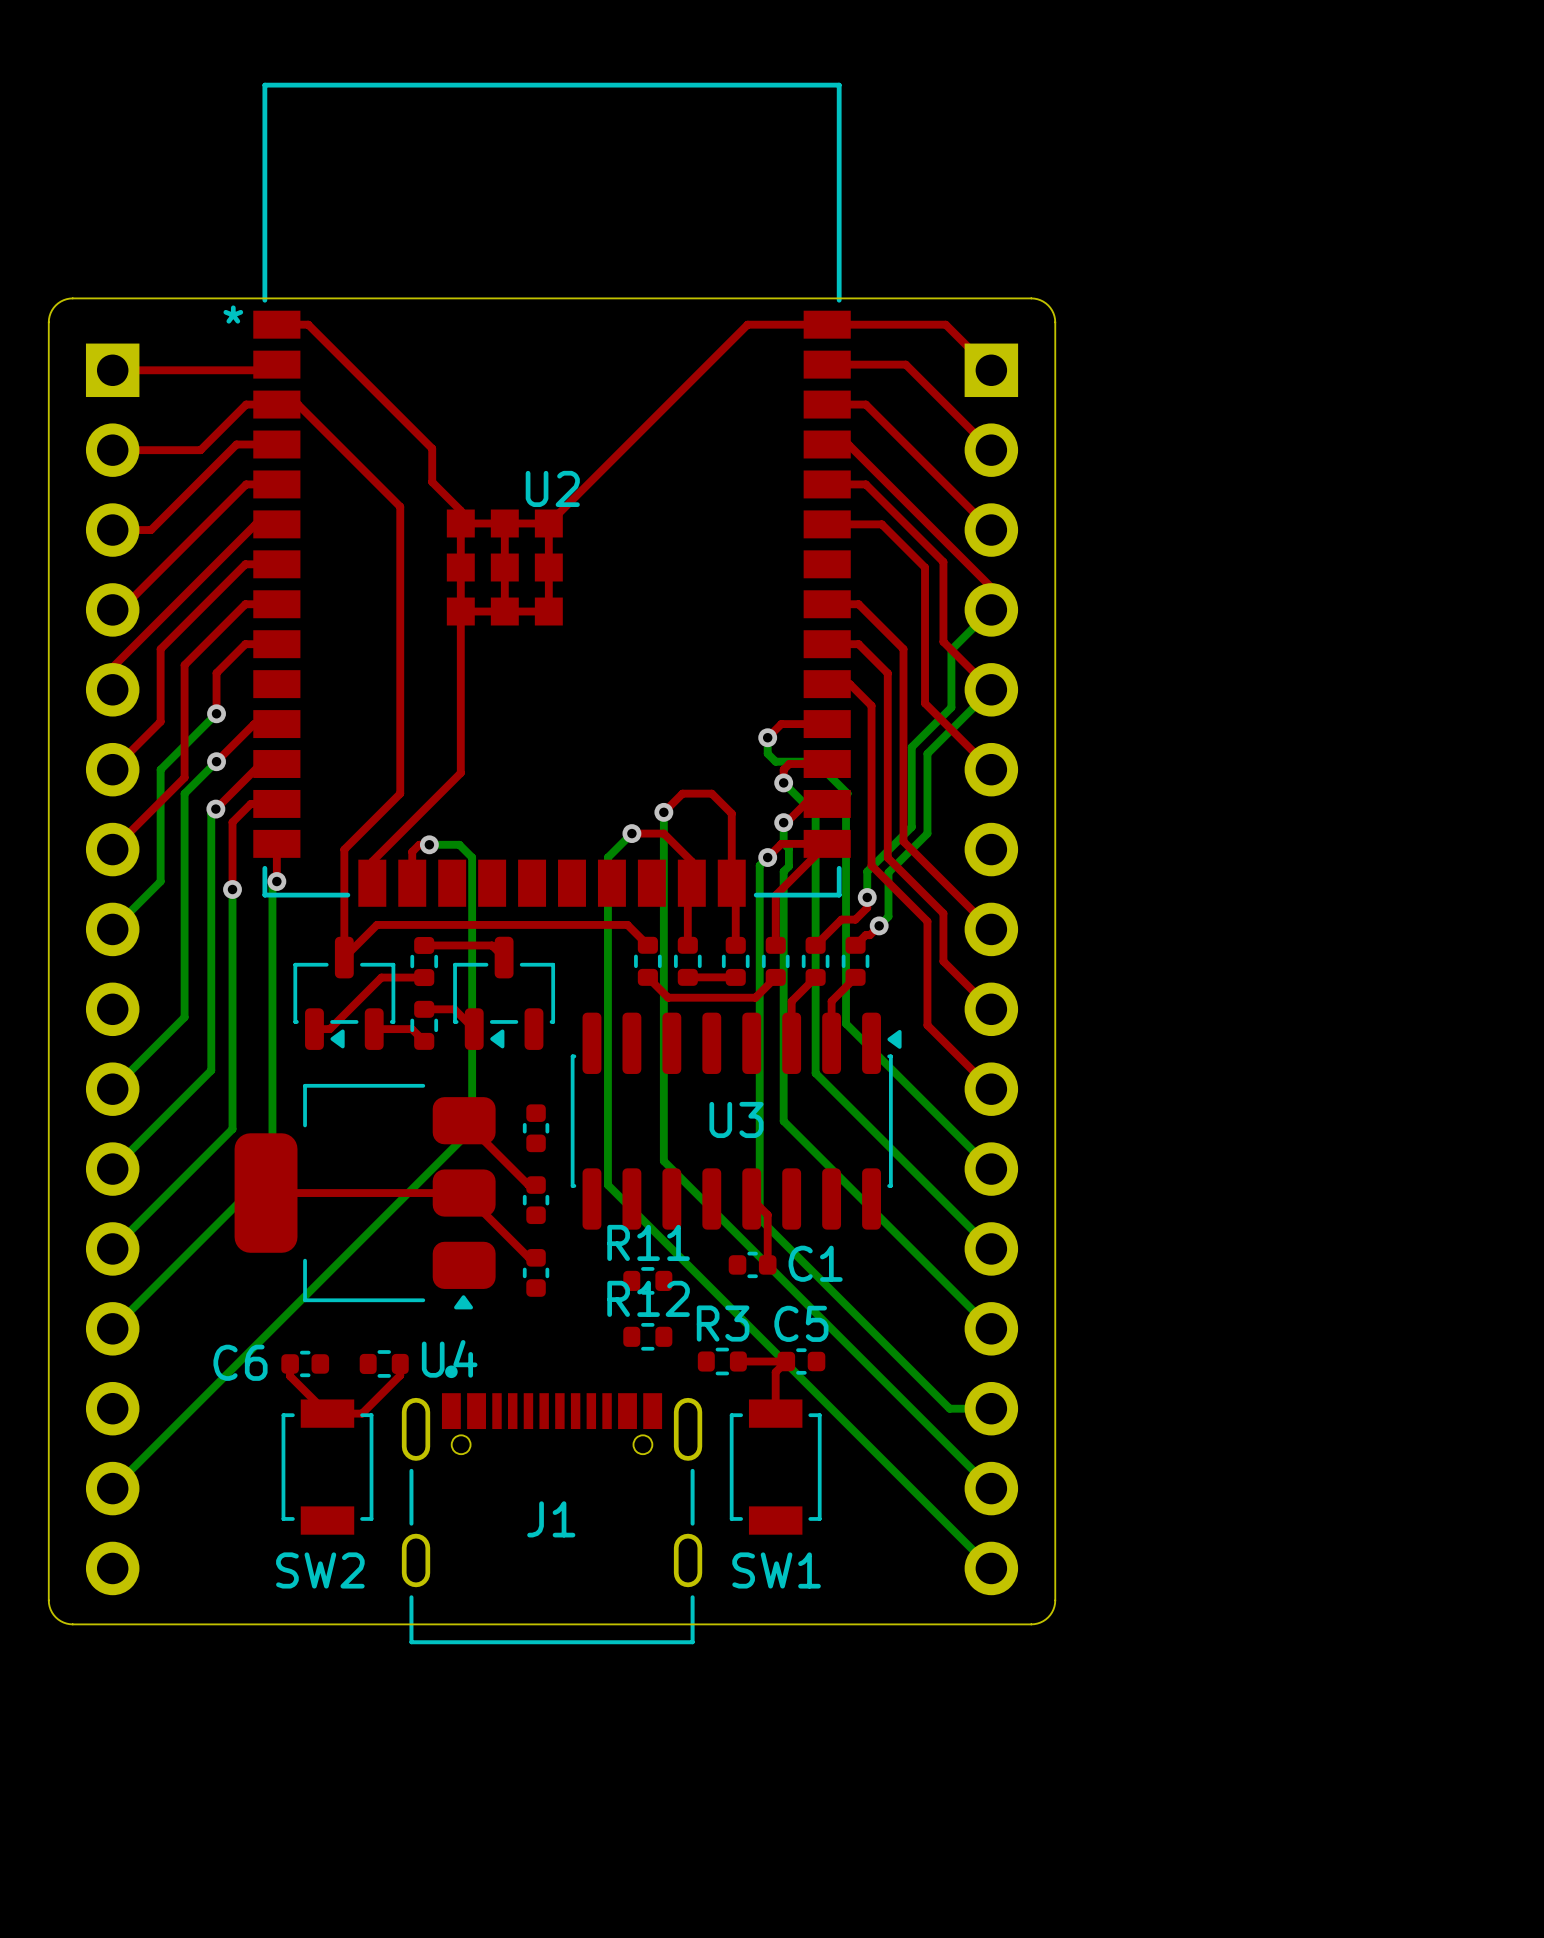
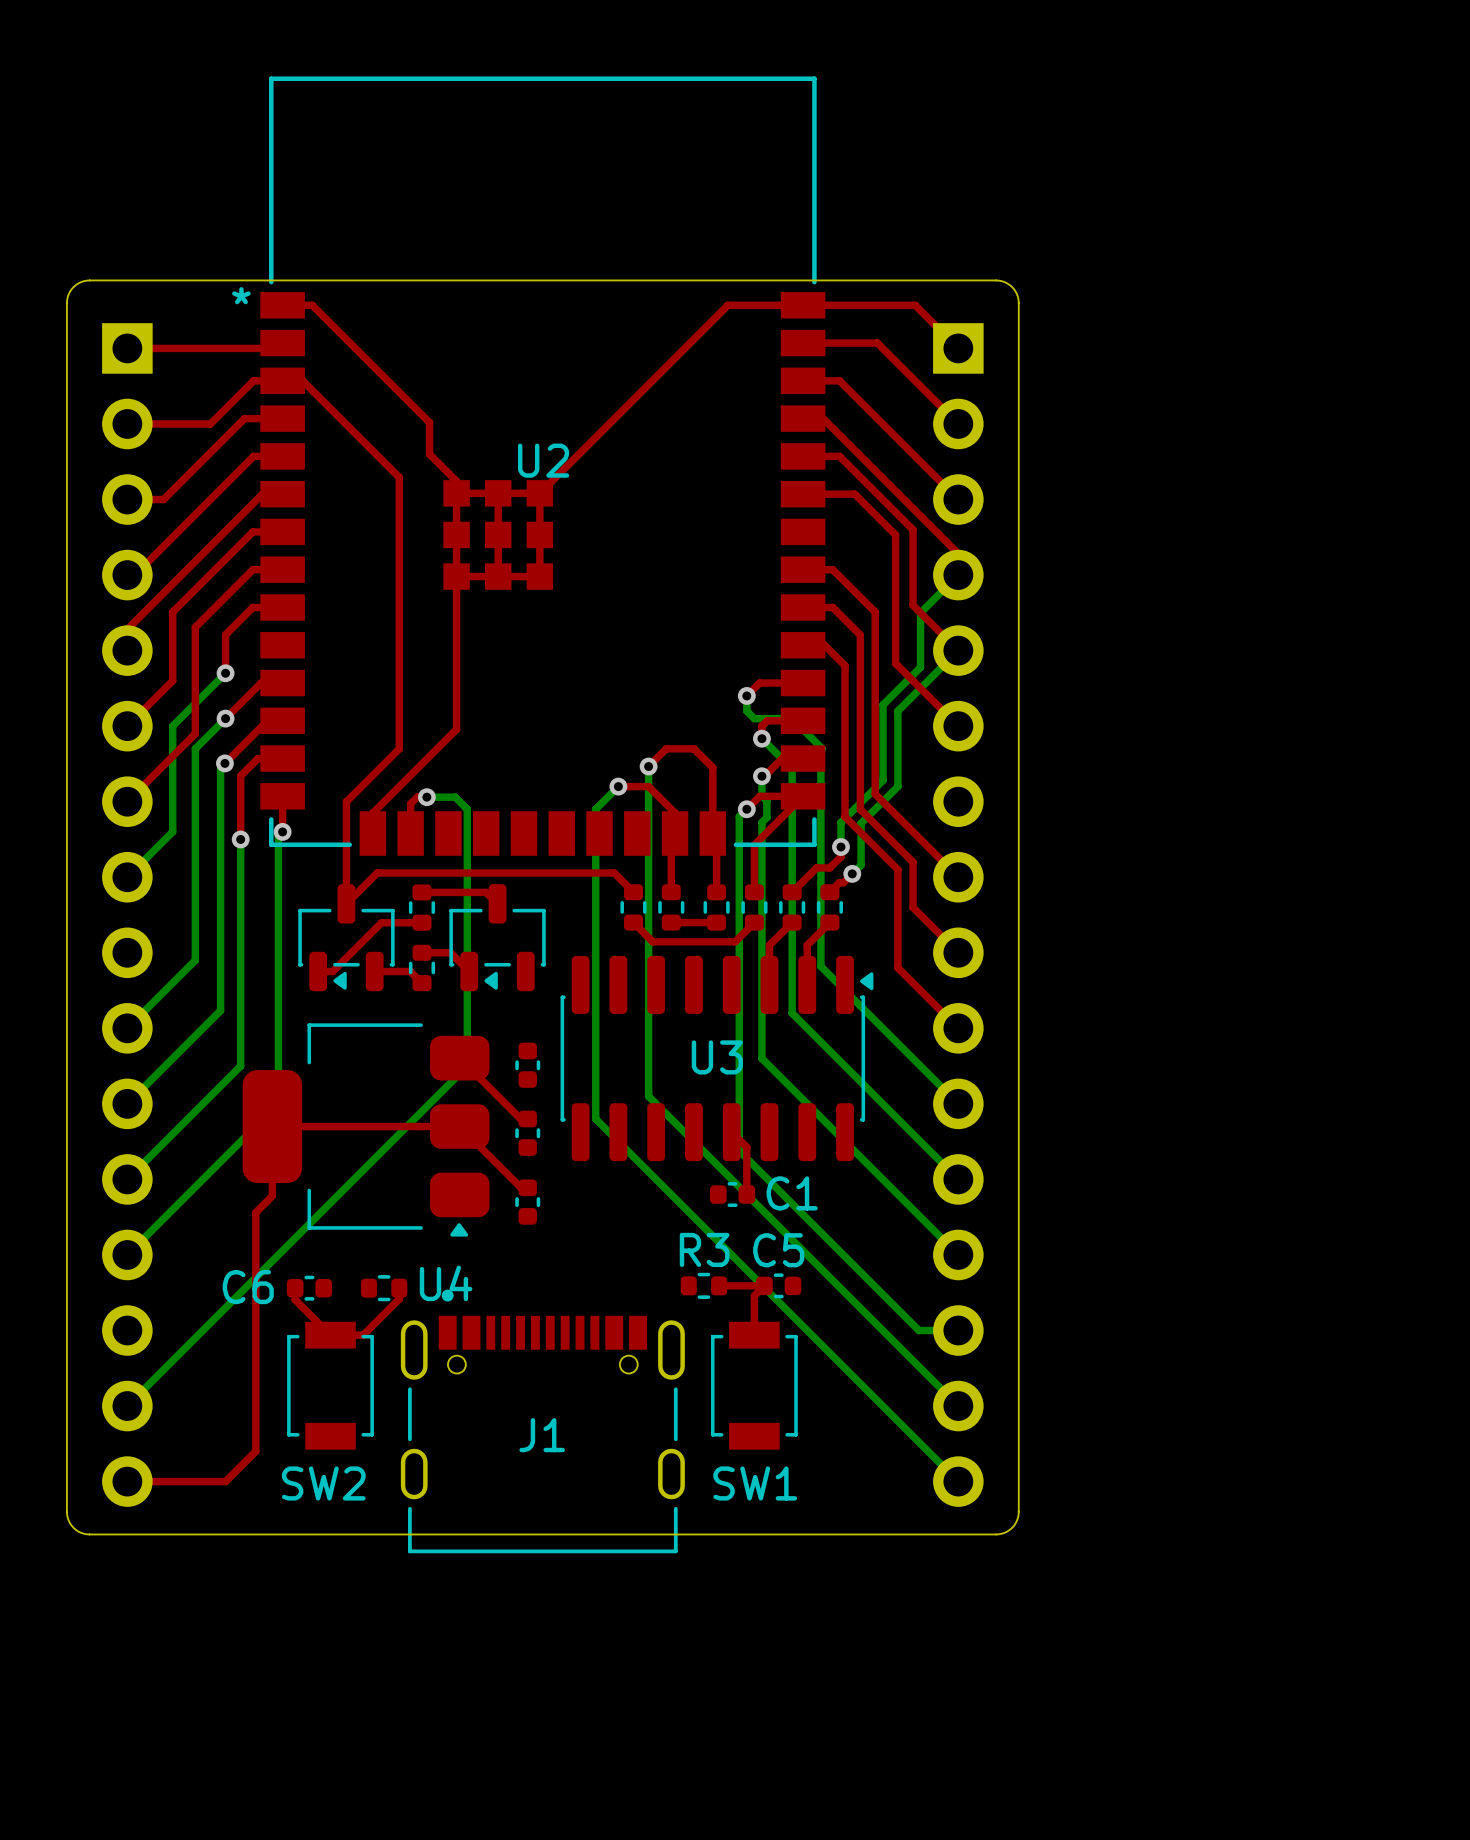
top track: none -> (272, 1126) (272, 1196) (255, 1212) (255, 1451) (225, 1481) (127, 1481)
R11: (647, 1280) -> none
R12: (647, 1336) -> none

